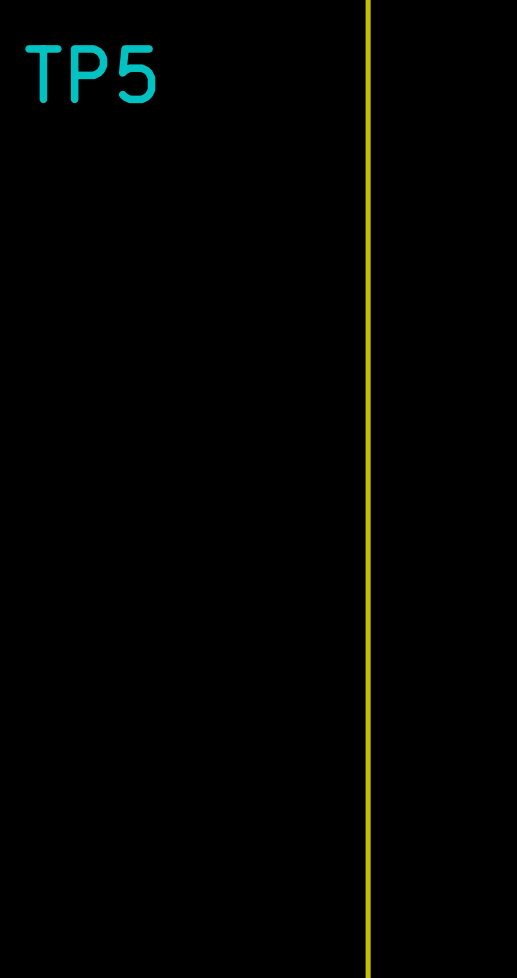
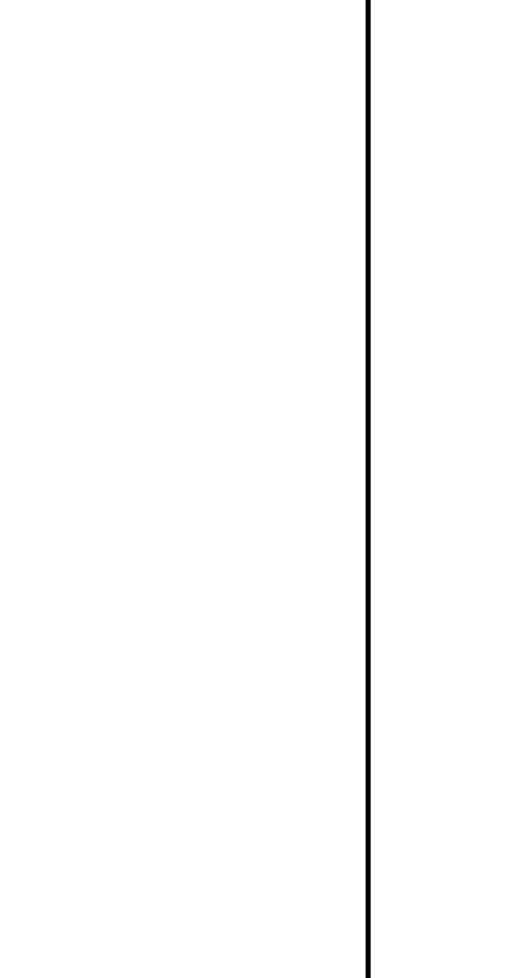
TP5 name: TP5 (90, 74) -> none

